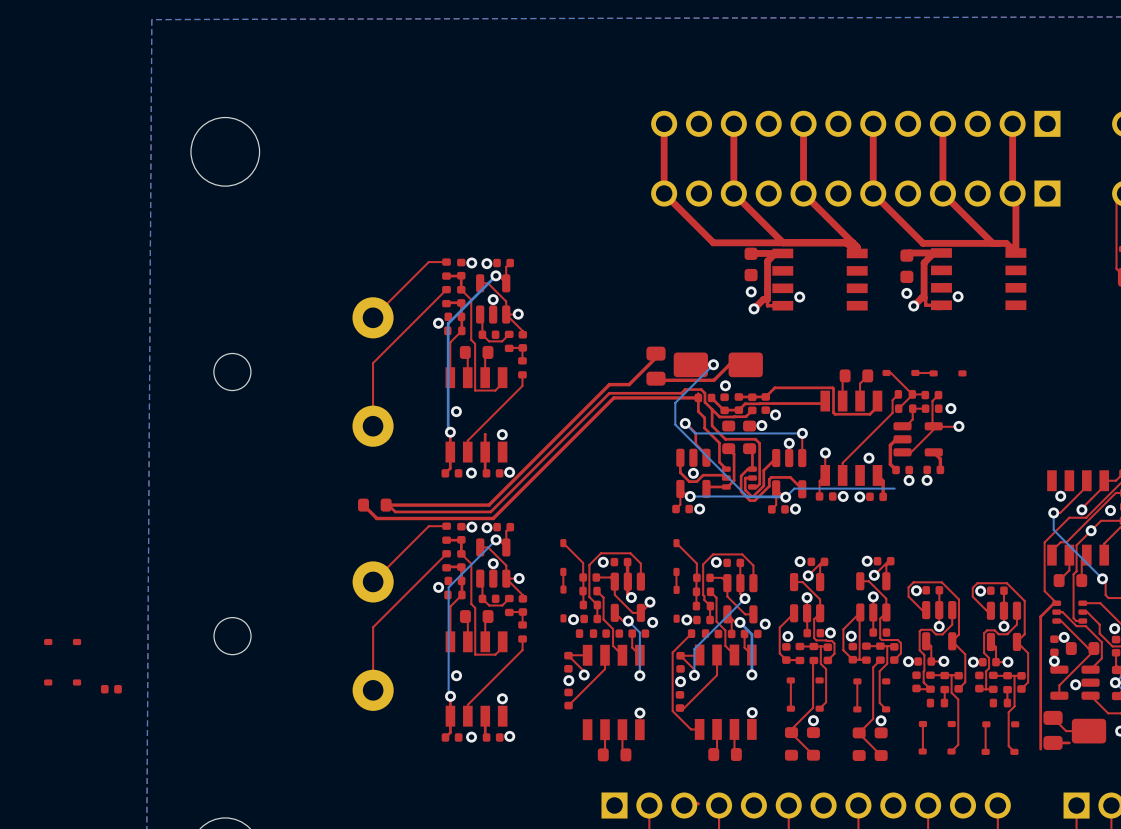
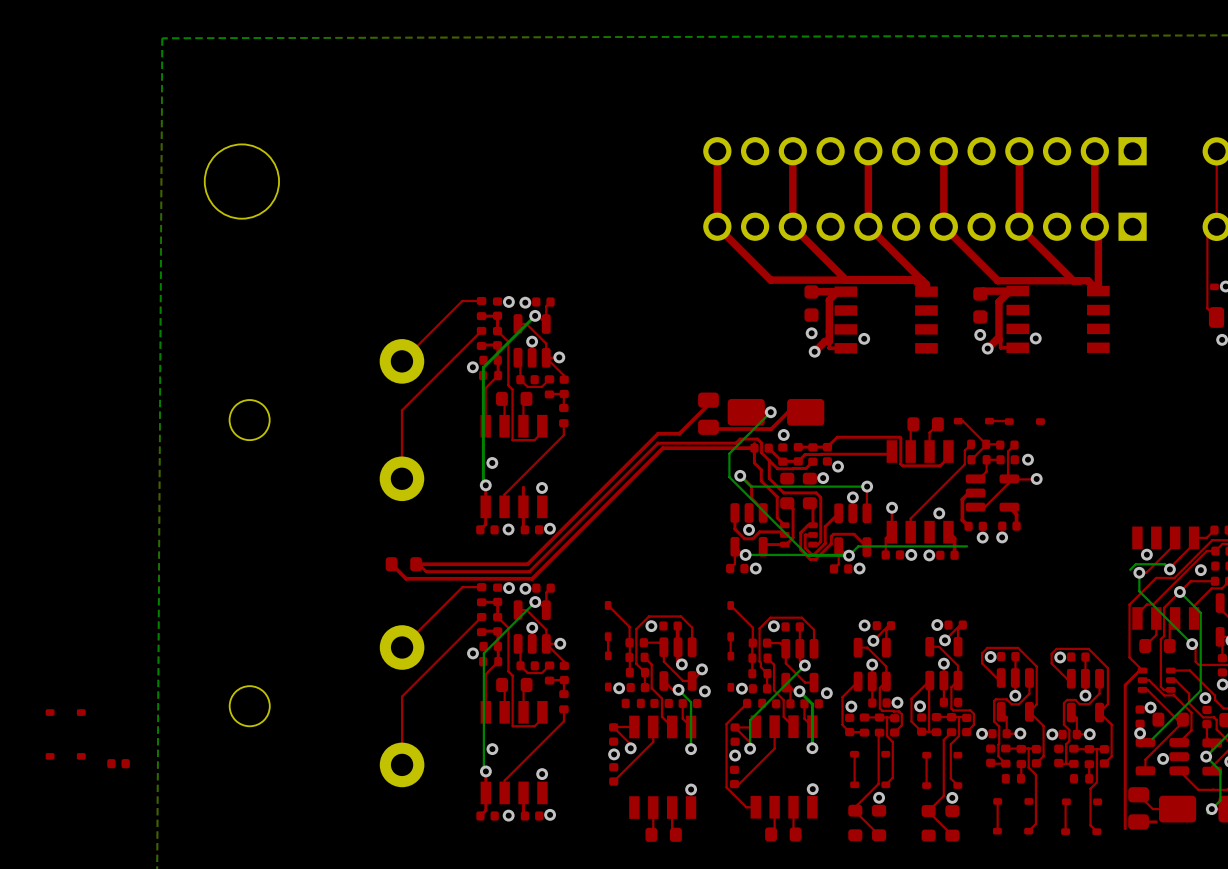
bottom track: none -> (1169, 569) (1164, 564) (1135, 564) (1130, 569)
bottom track: none -> (1179, 592) (1200, 612) (1200, 690) (1152, 738)

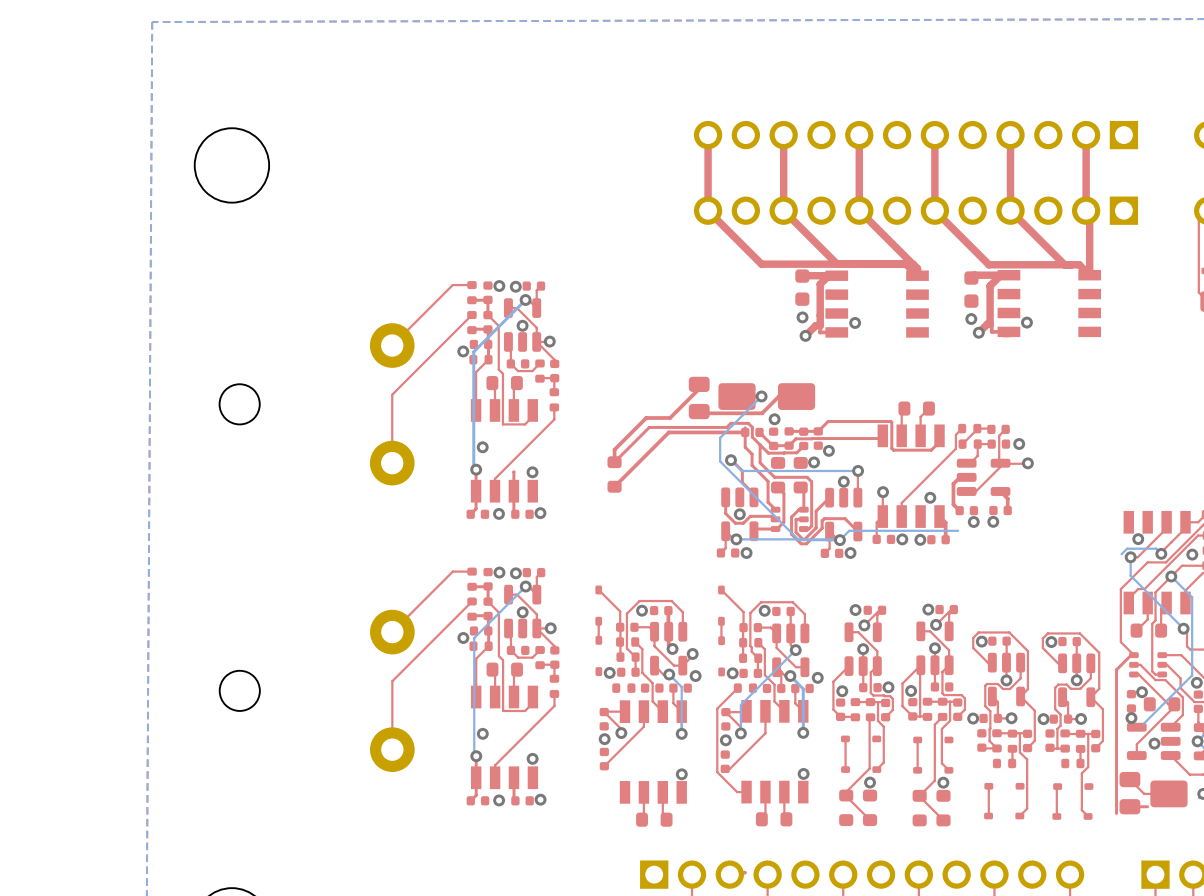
top track: (958, 421) (963, 421) (986, 444) -> none
part: (973, 421) -> none
top track: (989, 421) (1009, 421) -> none
part: (1024, 421) -> none
top track: (658, 433) (527, 564) (416, 564) (418, 564) (426, 571) (529, 571) (658, 443) -> (648, 417) (646, 417) (614, 449) (614, 462) (649, 427)
top track: (678, 448) (662, 448) (532, 578) (406, 578) (391, 564) -> (668, 432) (614, 486)
part rotation: 0° (403, 564) -> 90° clockwise (614, 474)
part position: (403, 564) -> (614, 474)
part: (65, 712) -> none
part: (65, 756) -> none
part: (118, 763) -> none

